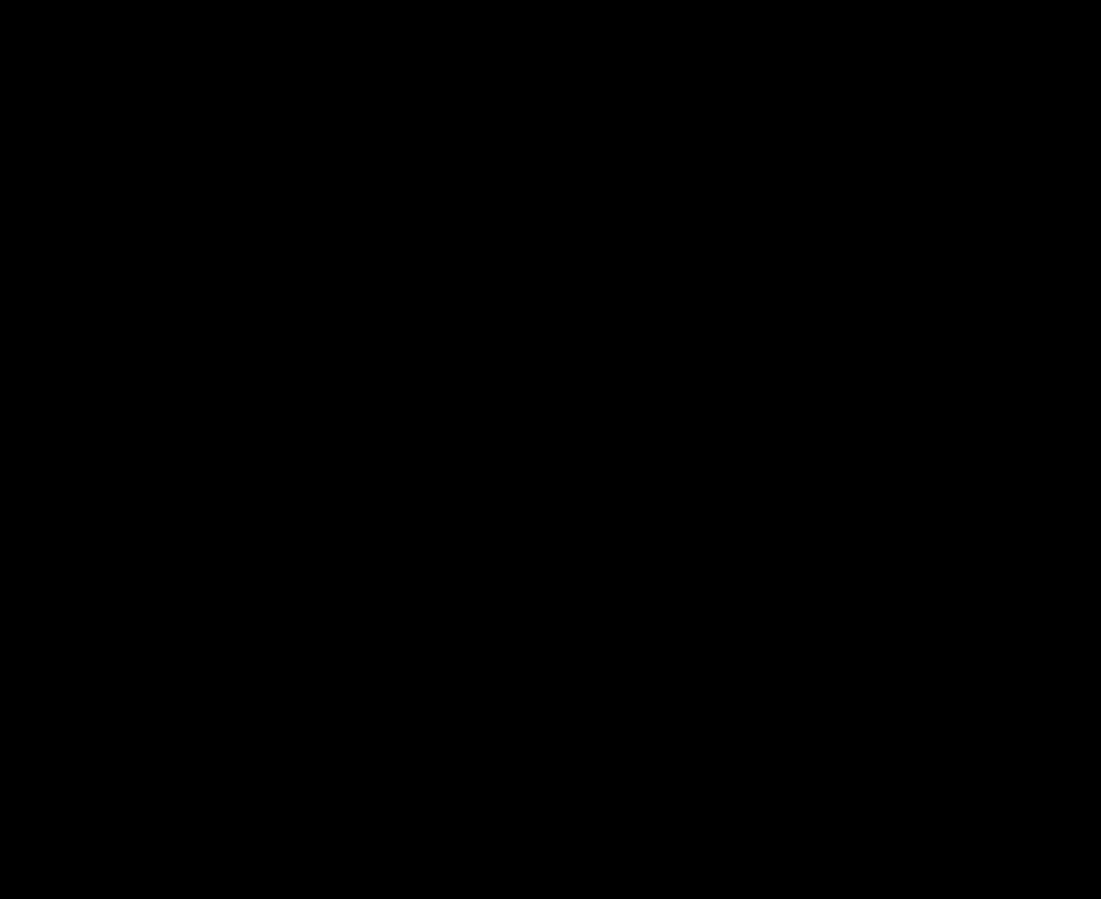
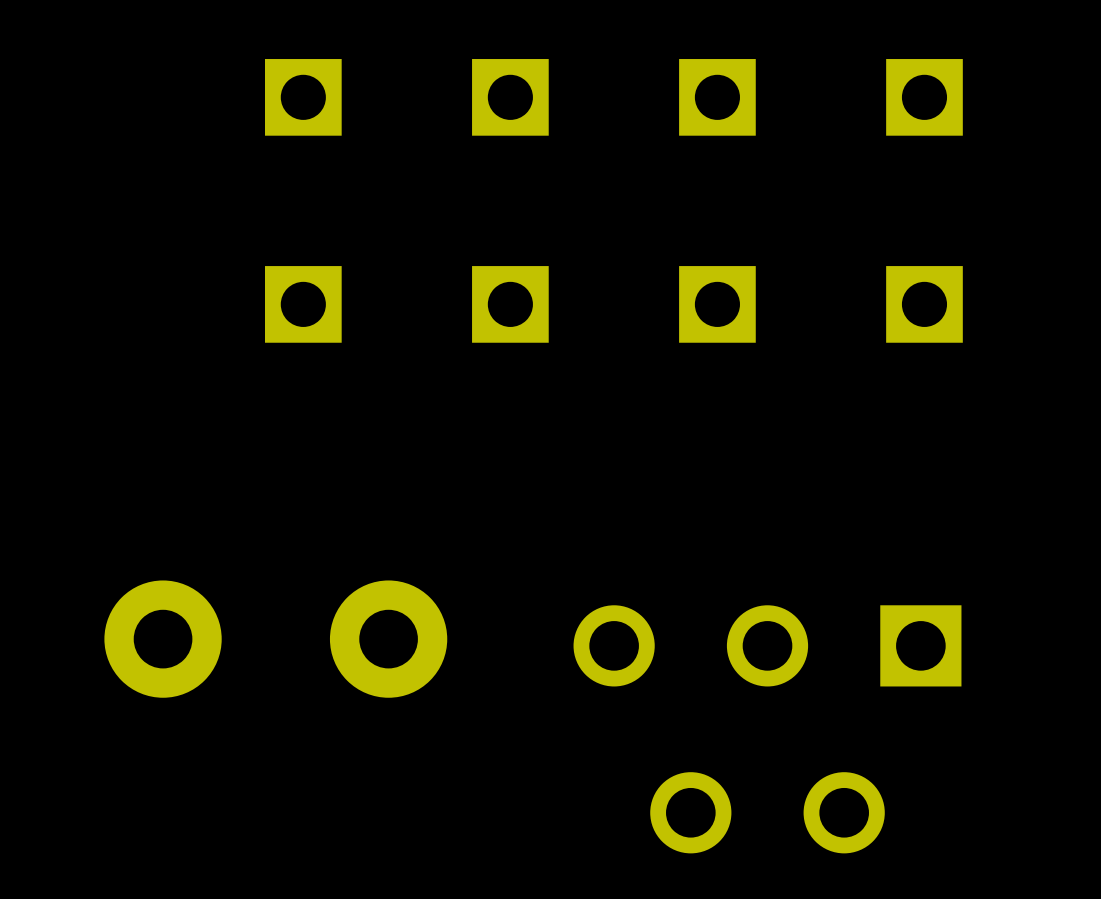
part: none -> (303, 97)
part: none -> (510, 97)
part: none -> (717, 97)
part: none -> (924, 97)
part: none -> (303, 304)
part: none -> (510, 304)
part: none -> (717, 304)
part: none -> (924, 304)
part: none -> (275, 639)
part: none -> (767, 729)

